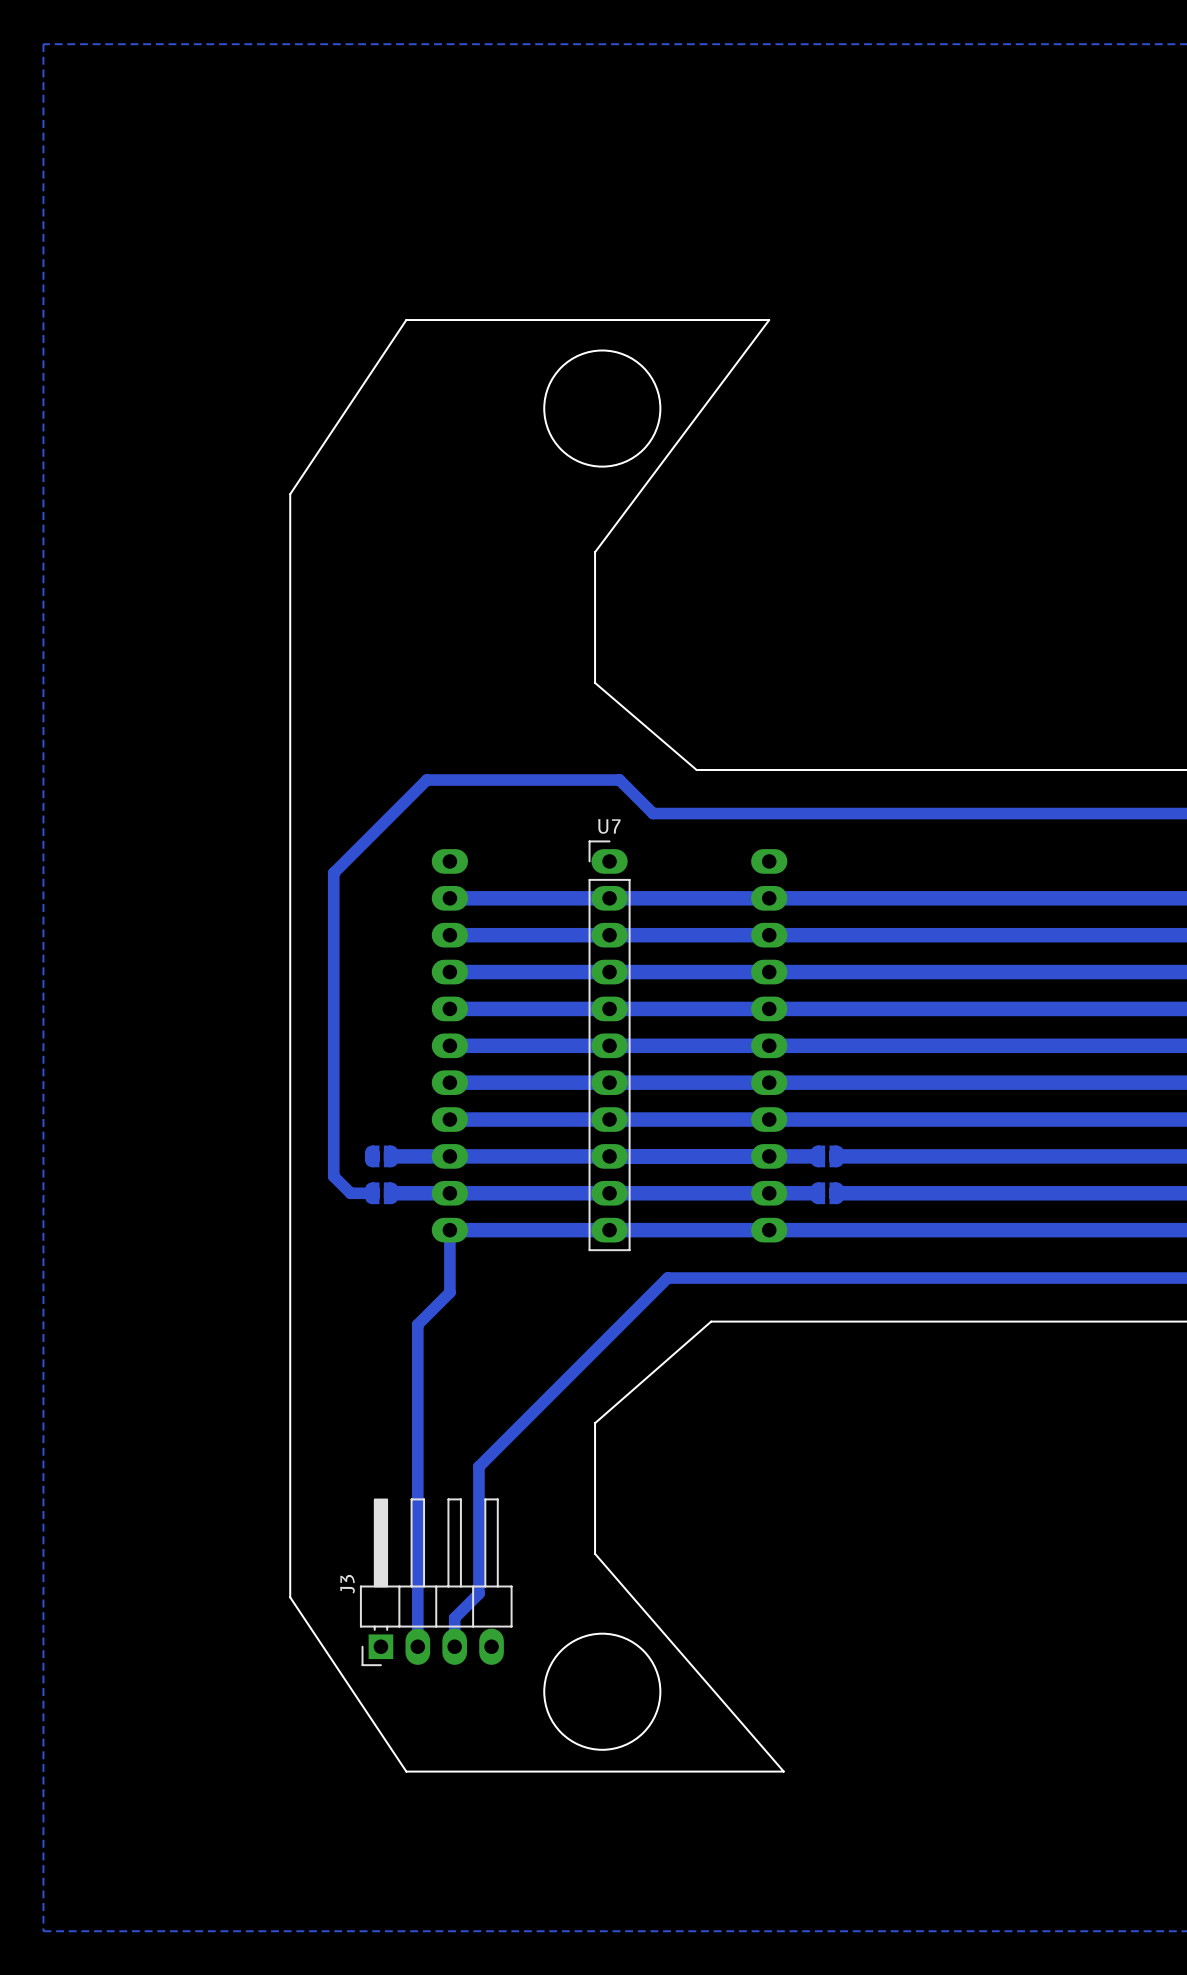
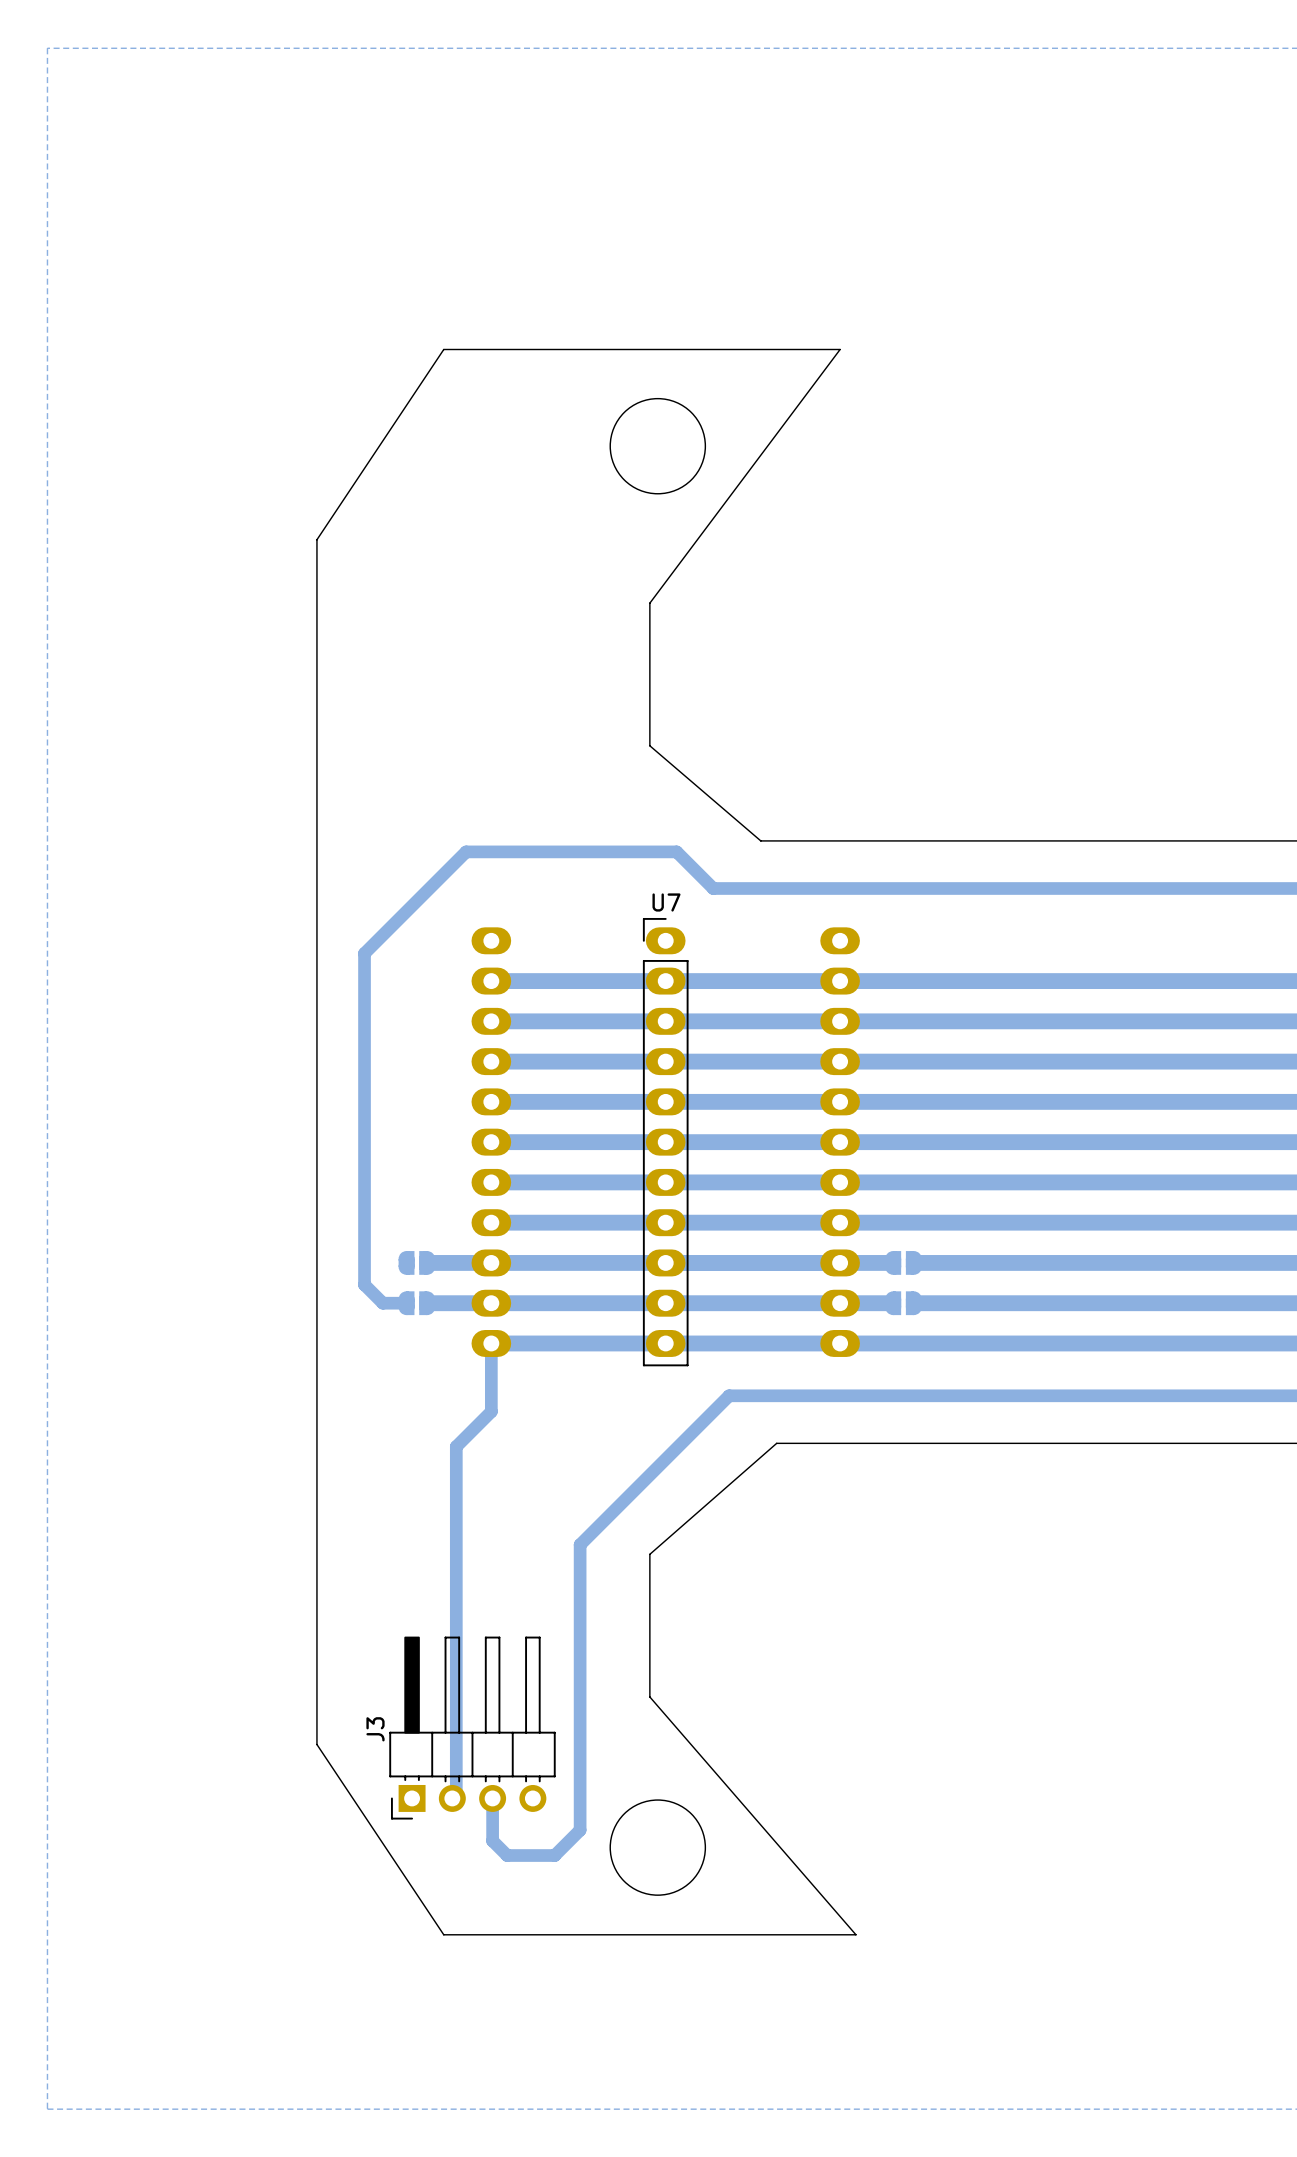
round board edge size: [543, 350, 661, 467] -> [609, 398, 706, 495]
bottom track: (531, 1414) (478, 1466) (478, 1593) (454, 1618) (454, 1646) -> (580, 1544) (580, 1830) (554, 1855) (507, 1855) (492, 1840) (492, 1798)
J3 footprint: [360, 1498, 513, 1667] -> [389, 1636, 556, 1820]
round board edge size: [543, 1633, 661, 1751] -> [609, 1799, 706, 1896]

